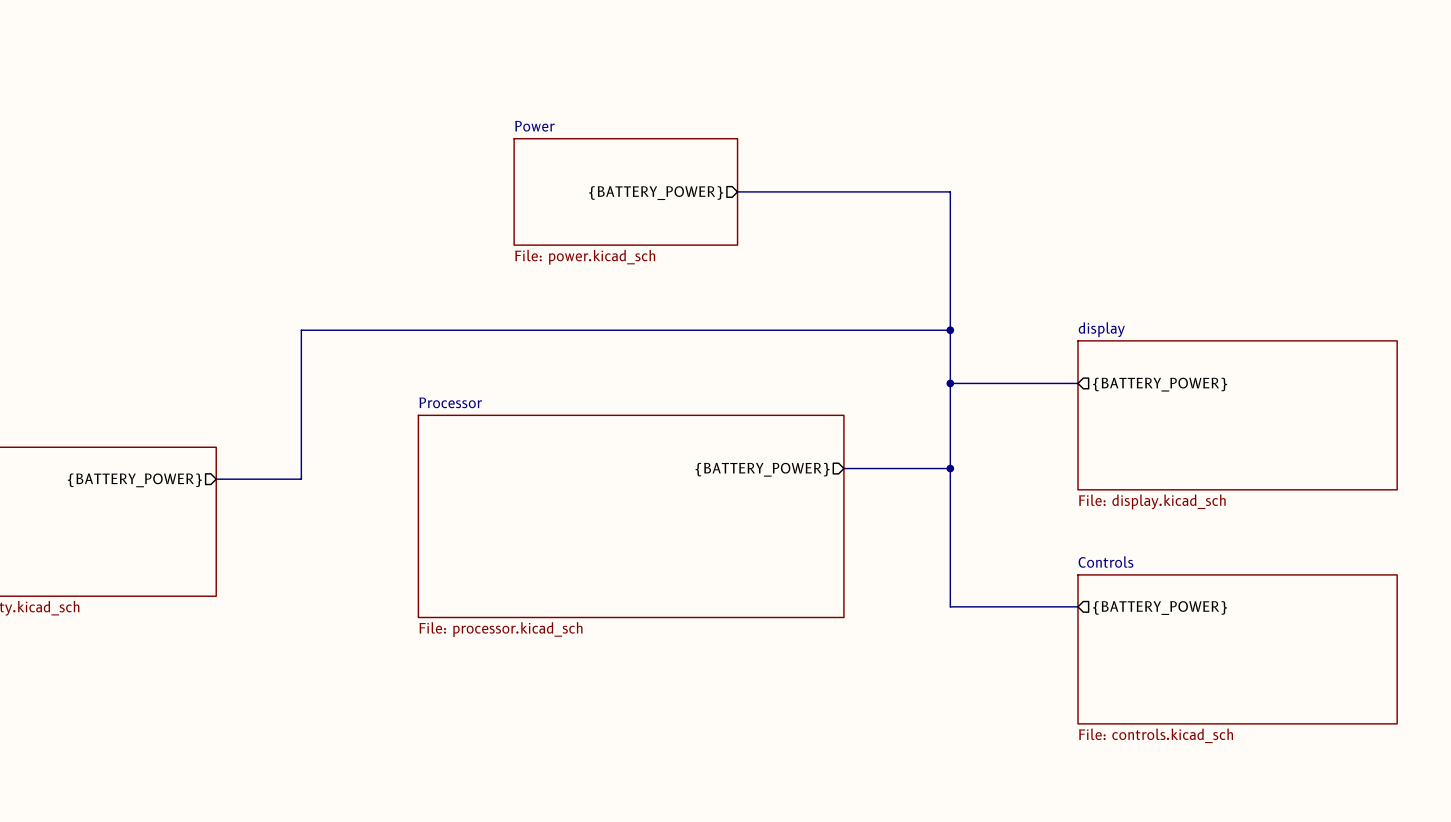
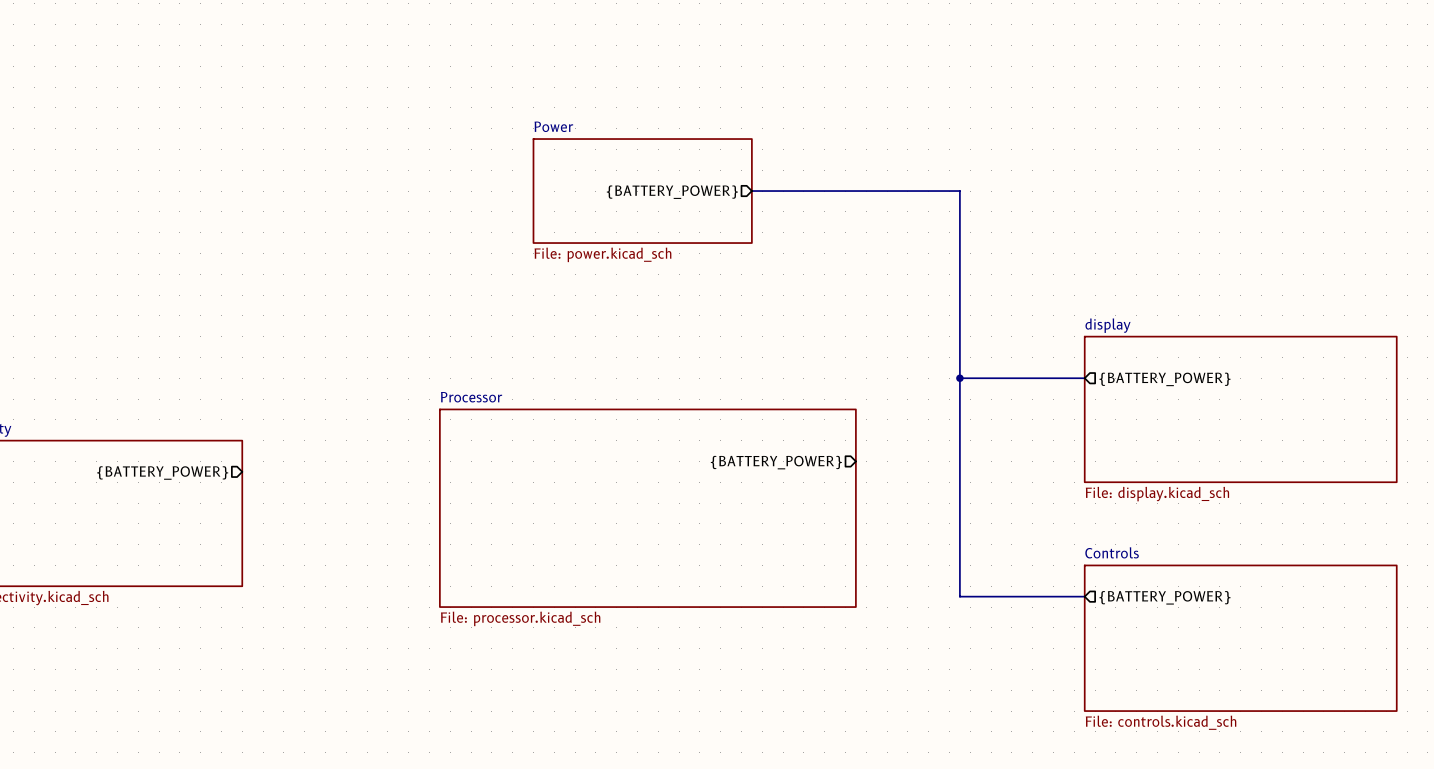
bus: (950, 330) (301, 330) (301, 479) (216, 479) -> none
junction: (950, 330) -> none
bus: (843, 468) (950, 468) -> none
junction: (950, 468) -> none

